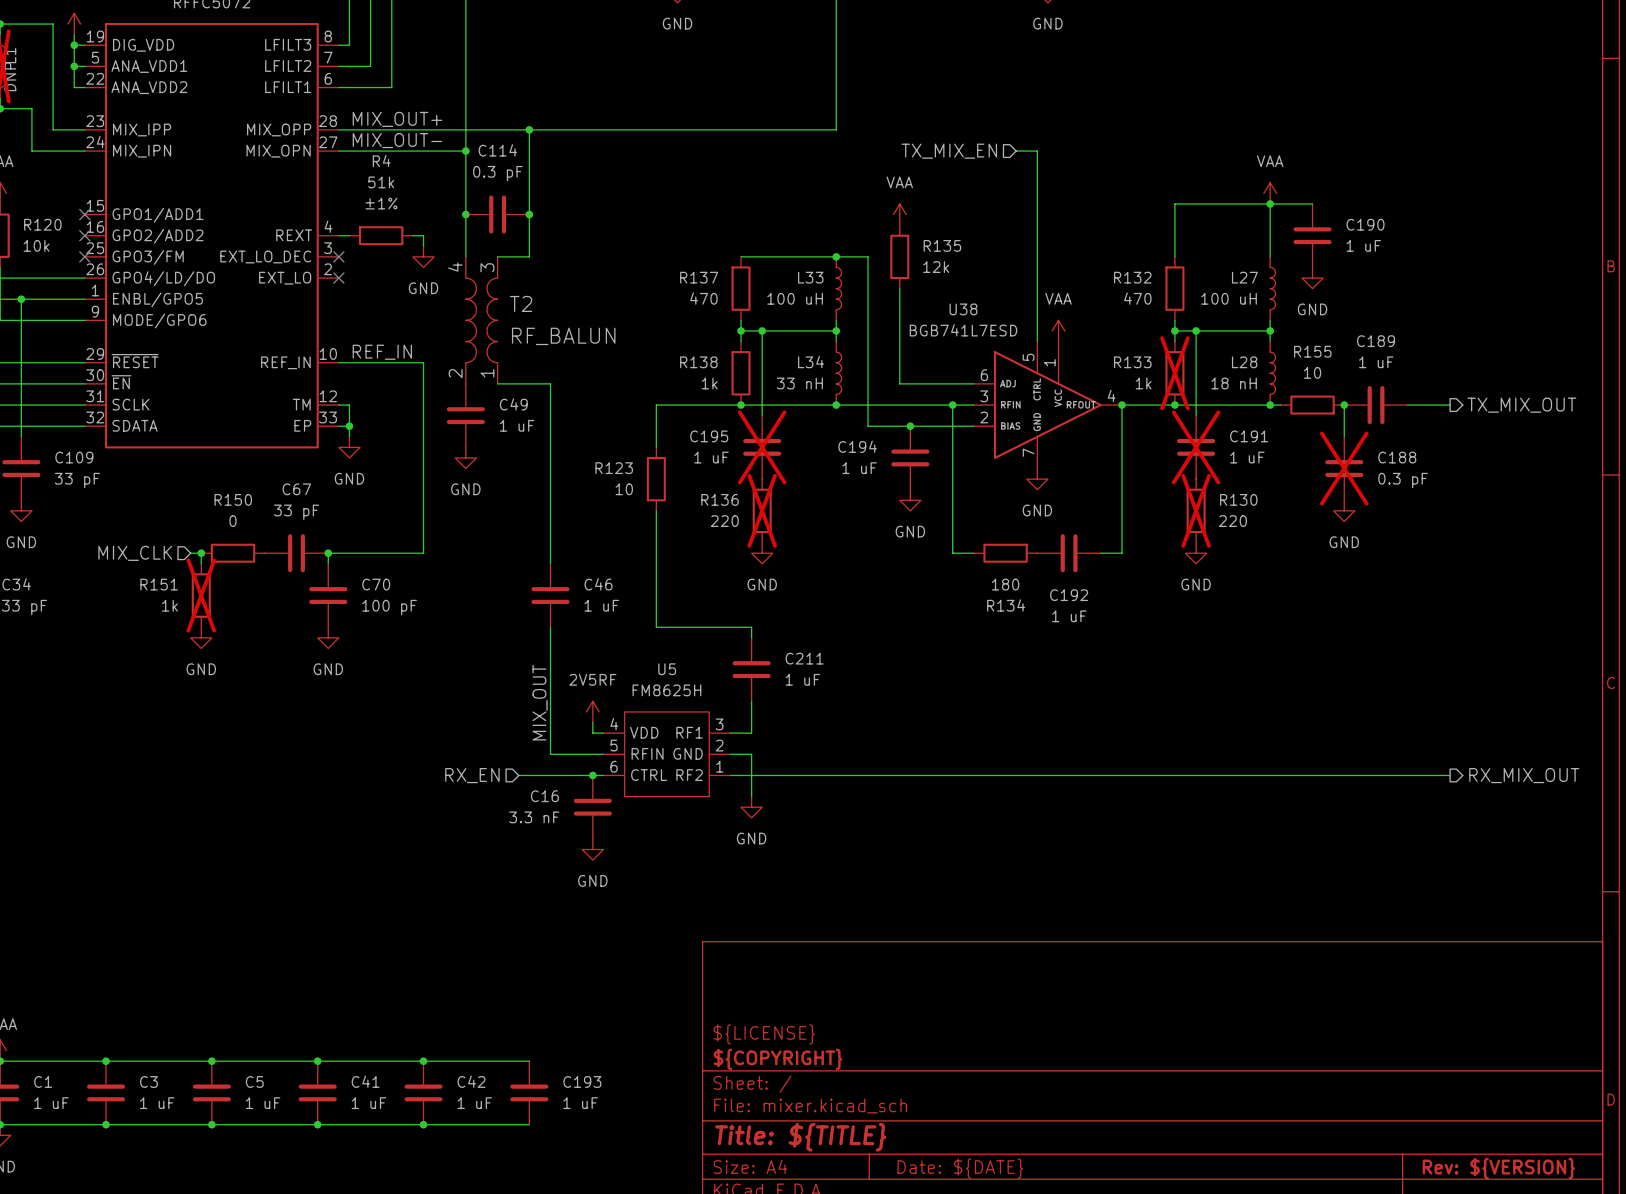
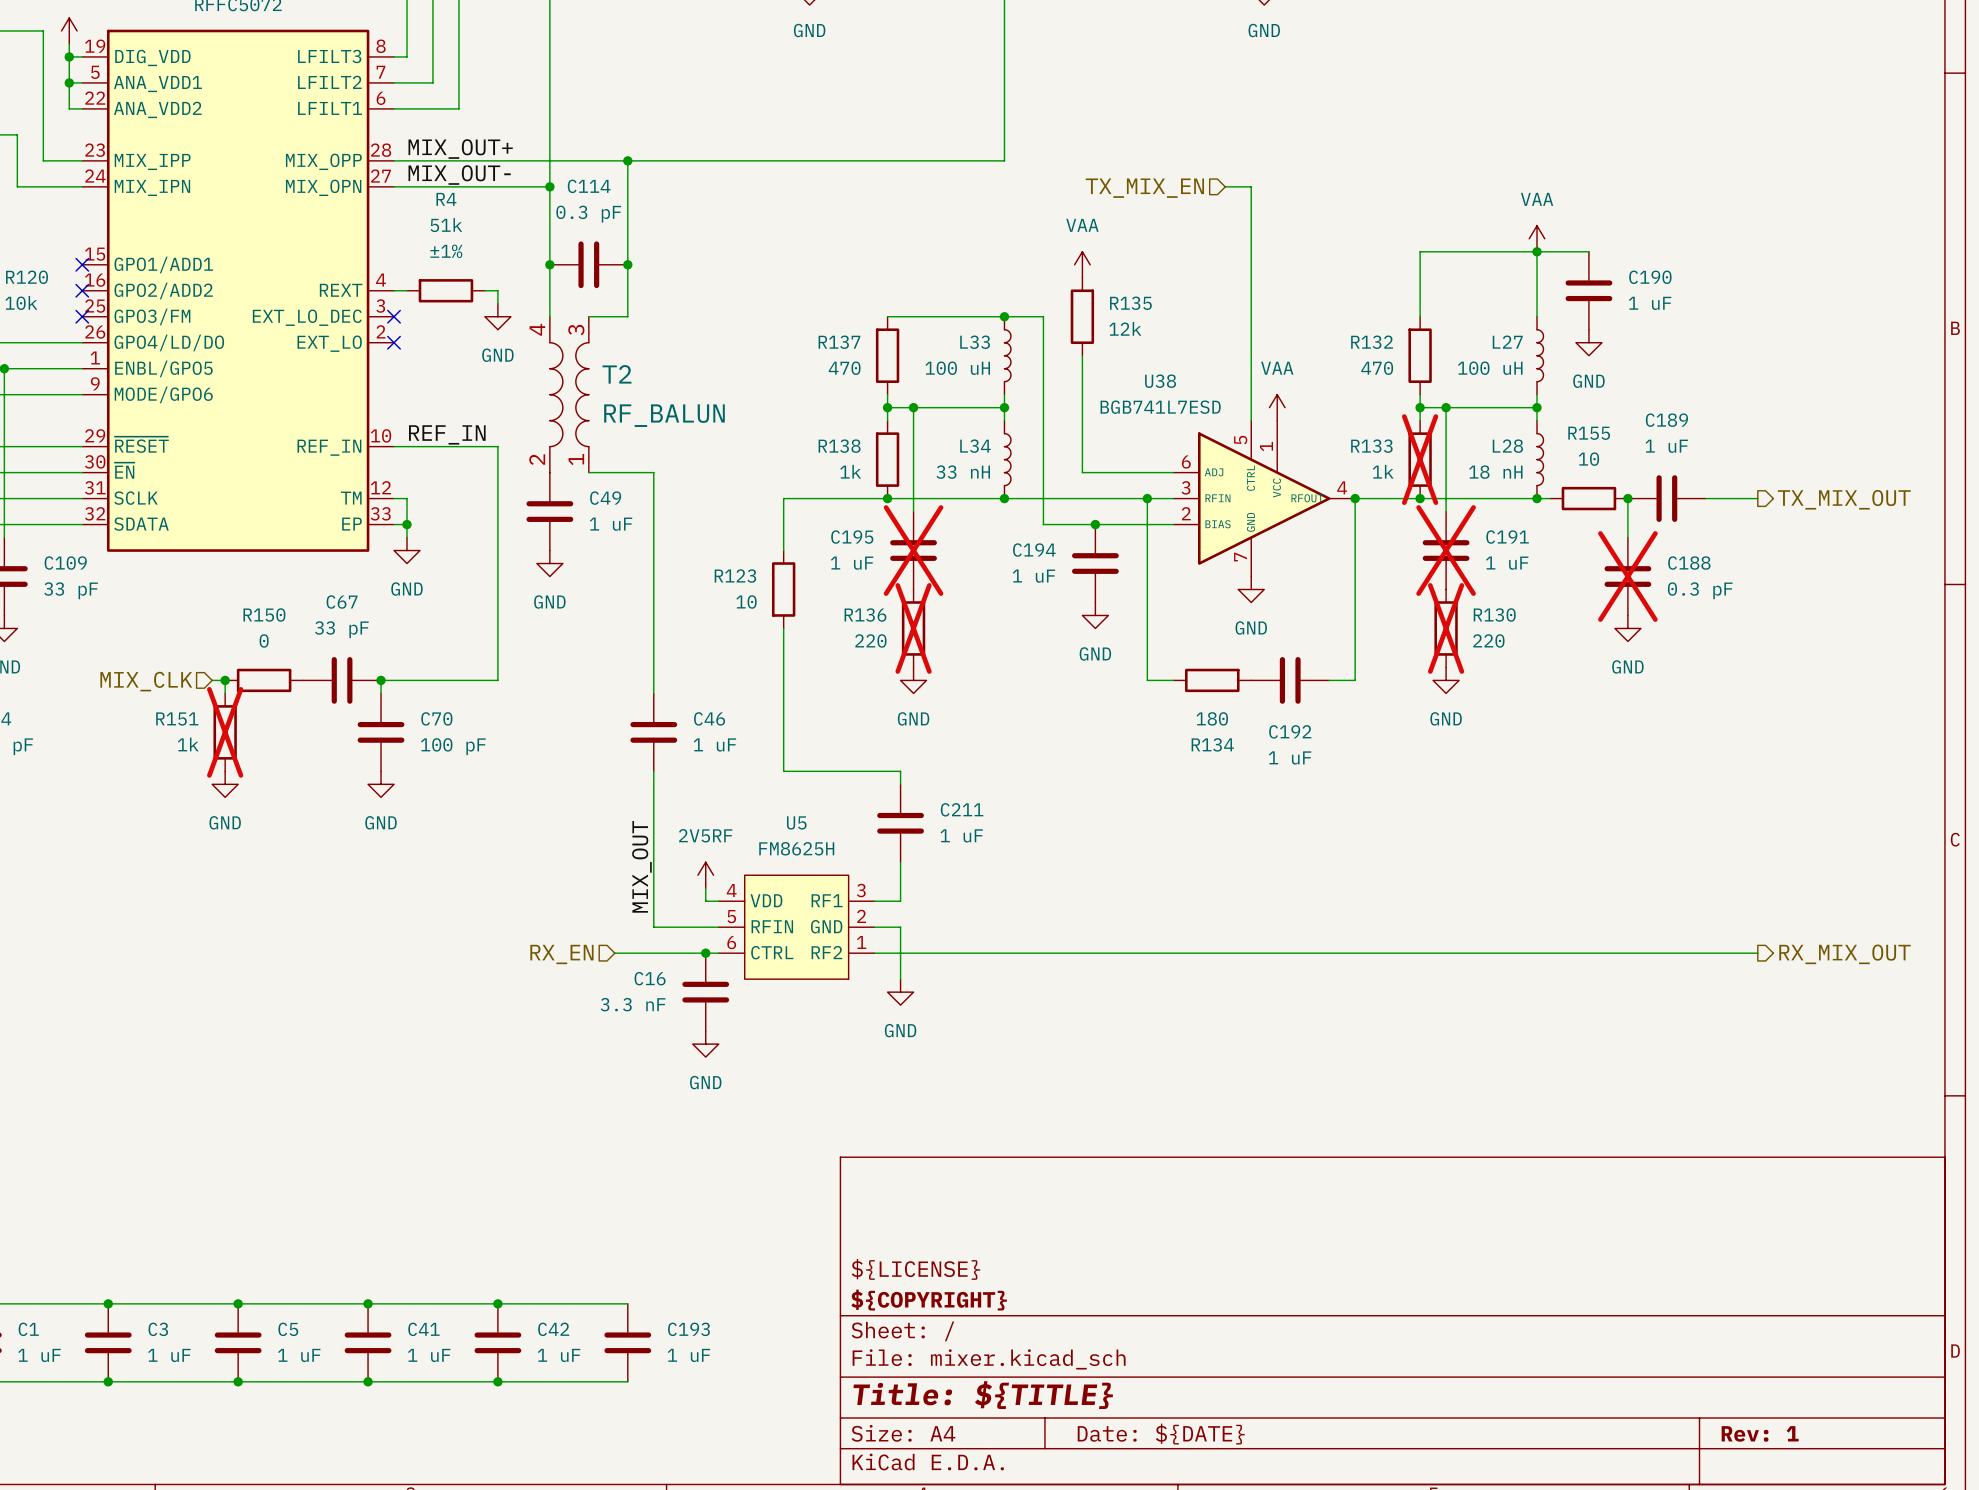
title block: Rev: ${VERSION} (1498, 1168) -> Rev: 1 (1760, 1433)

